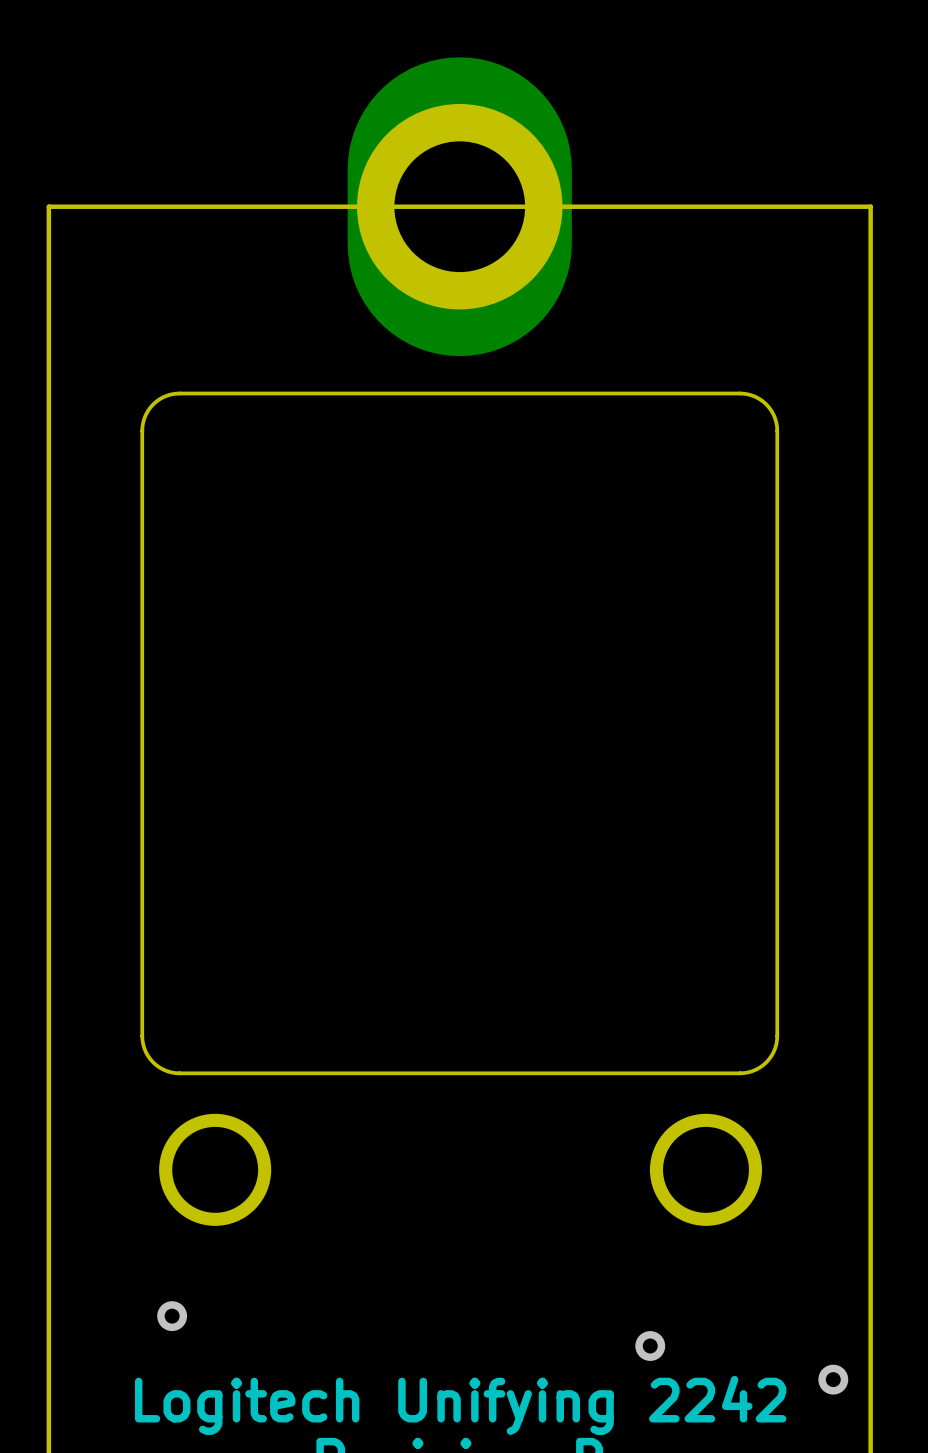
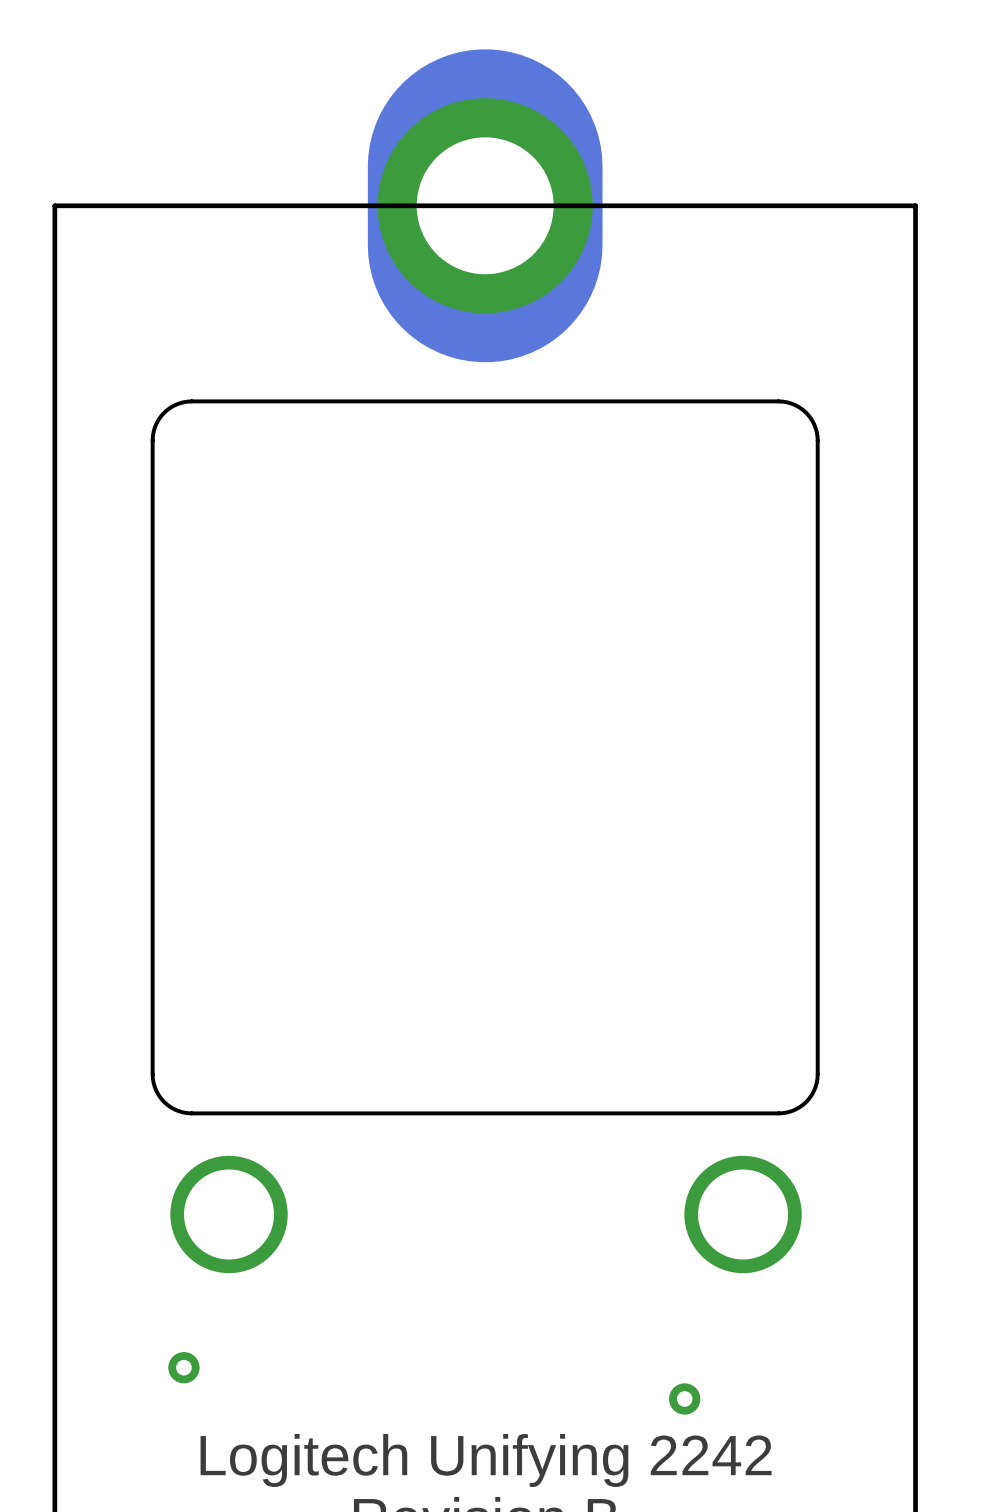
via: (833, 1379) -> none

